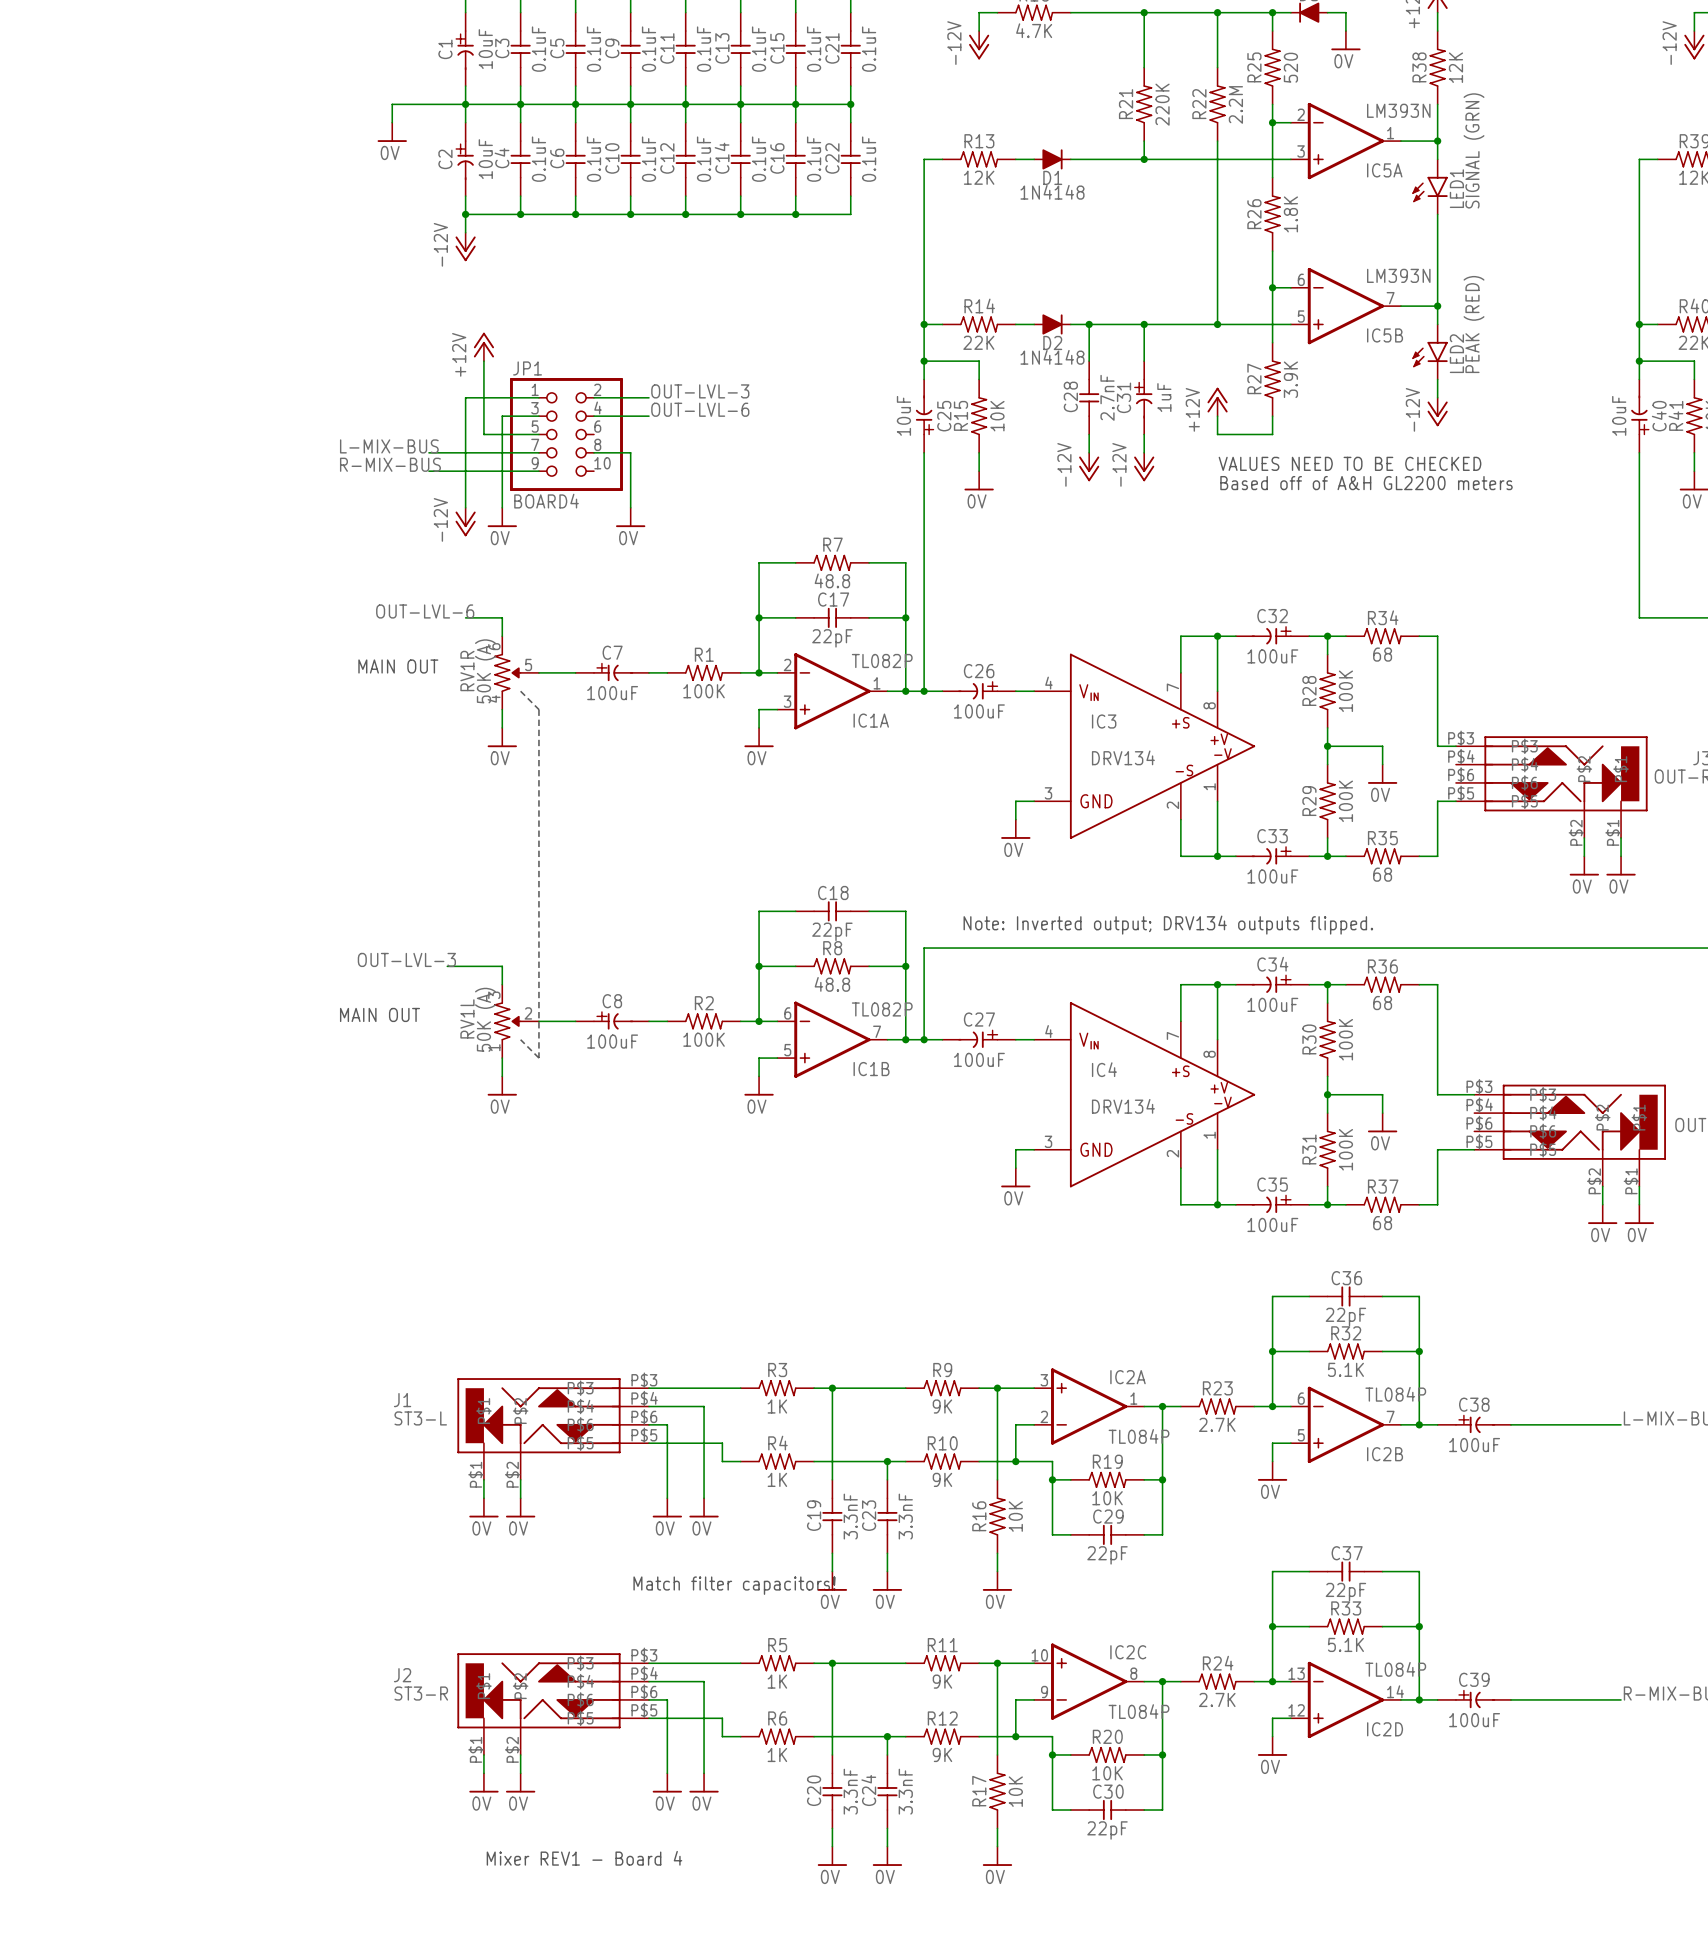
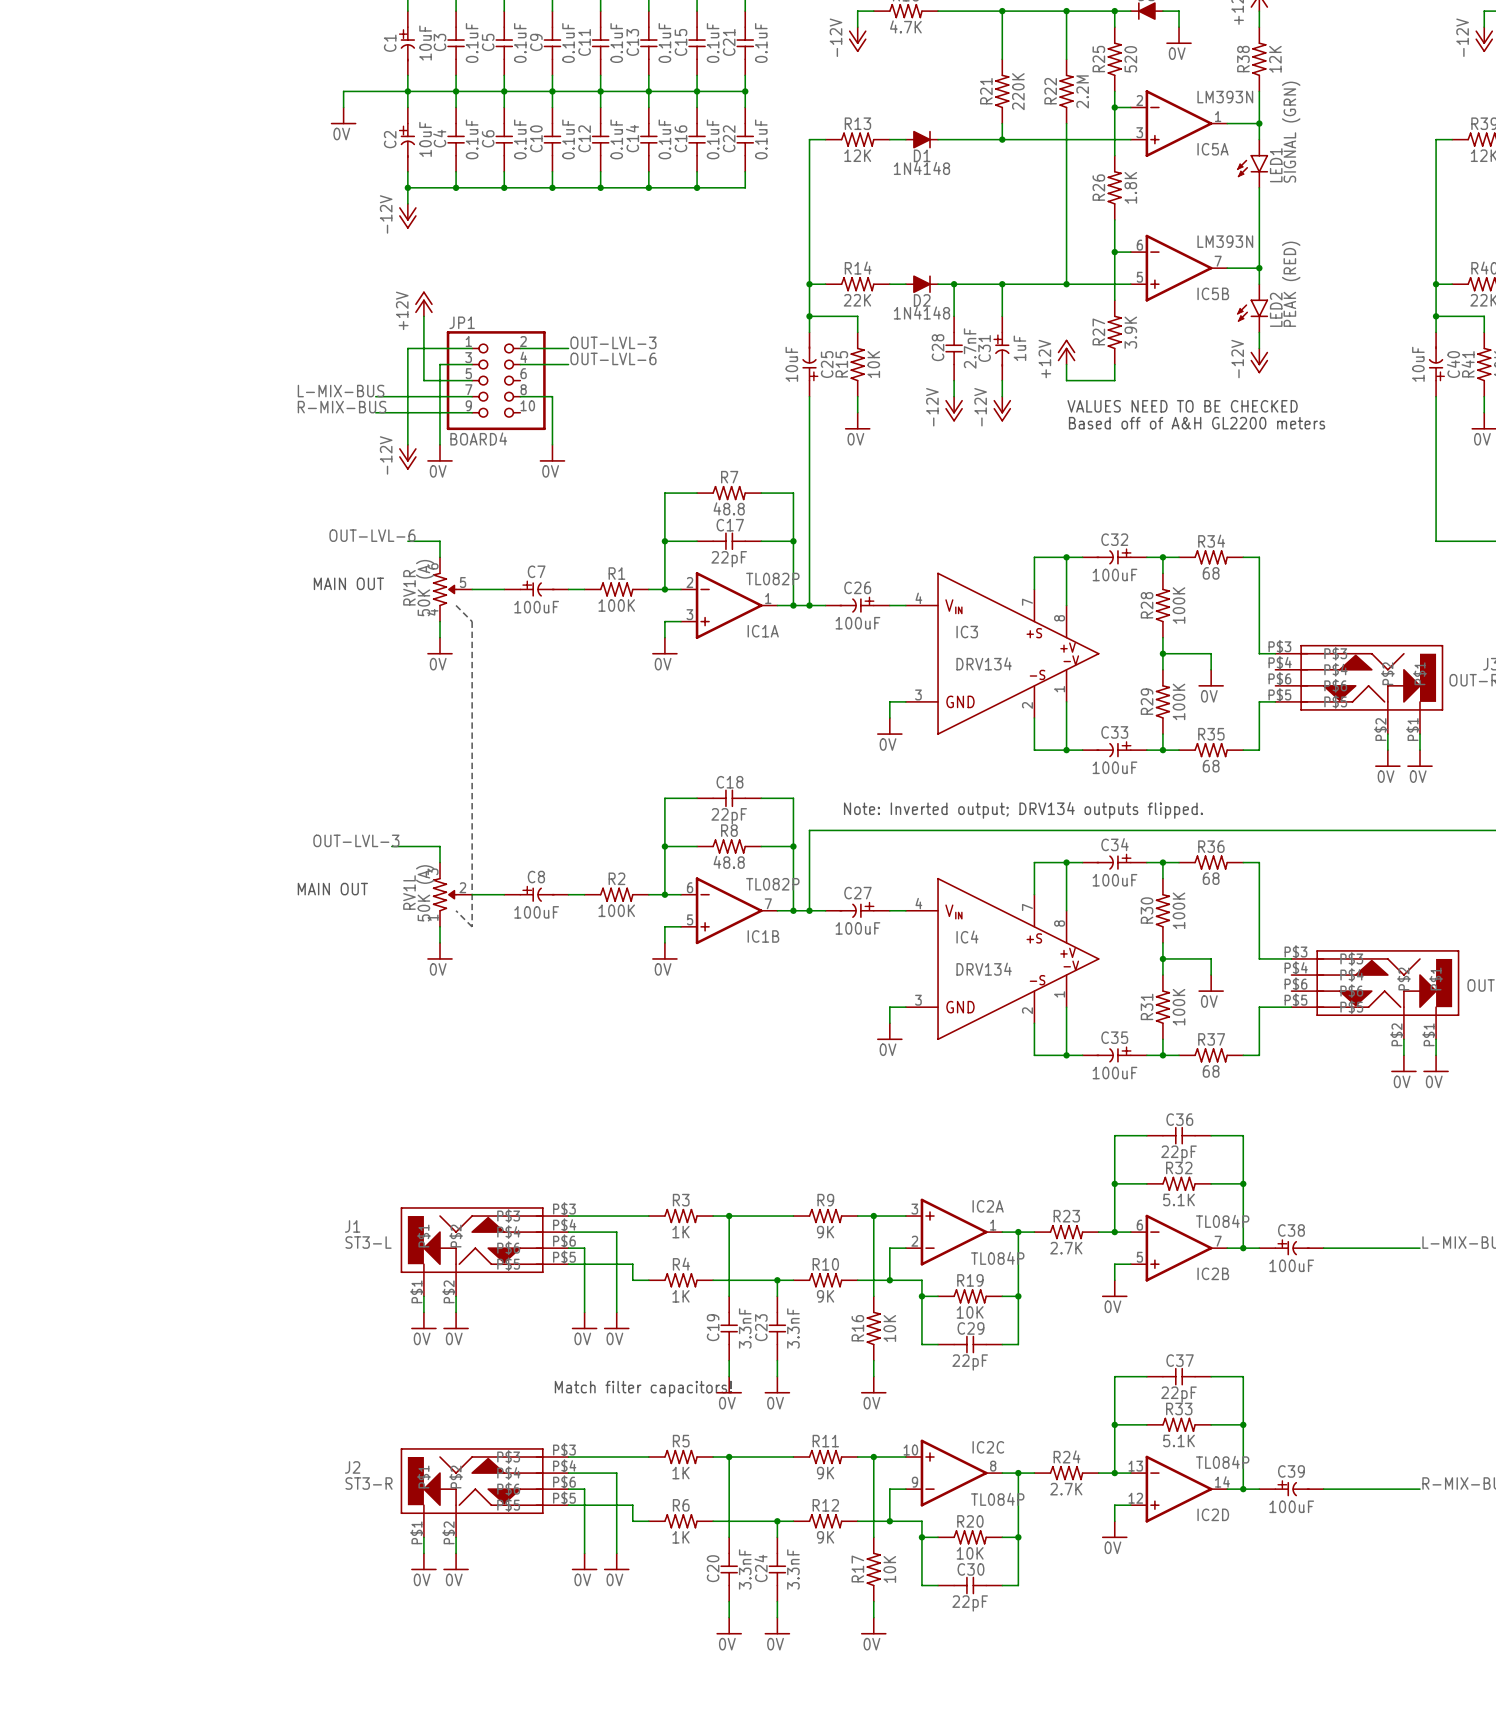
text: Mixer REV1 - Board 4 (584, 1858) -> none

